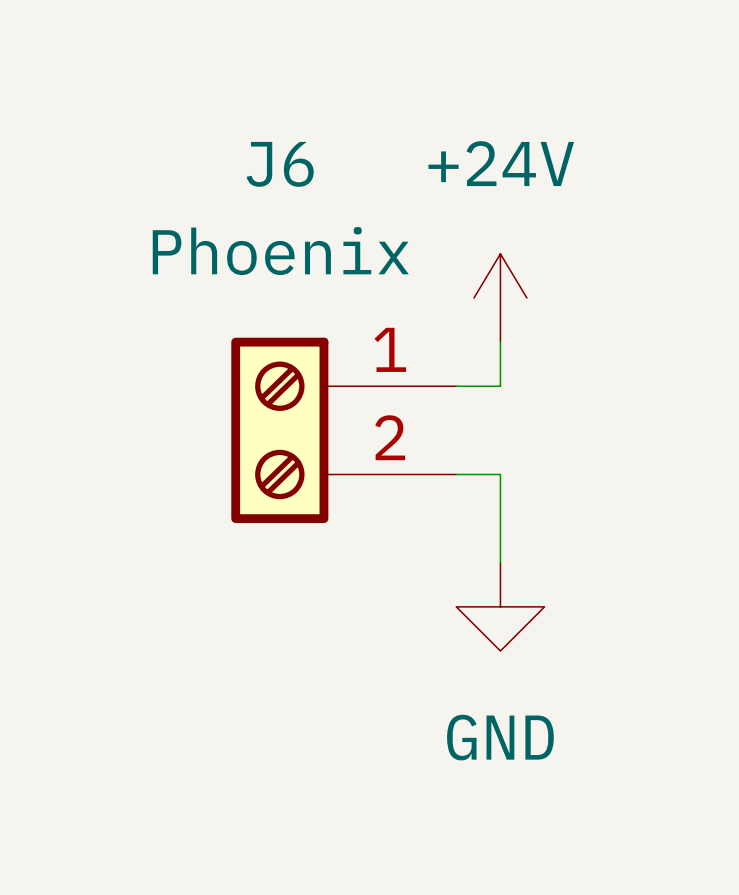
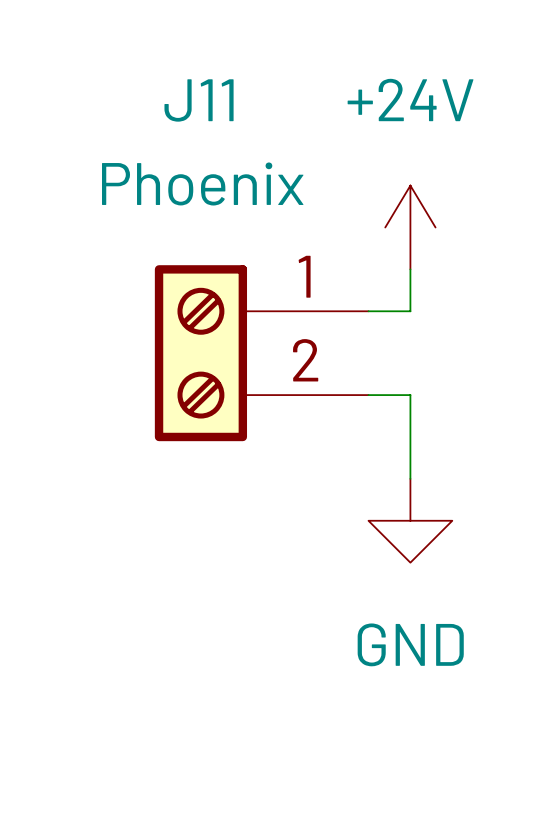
J6 name: J6 (280, 164) -> J11 (199, 100)

